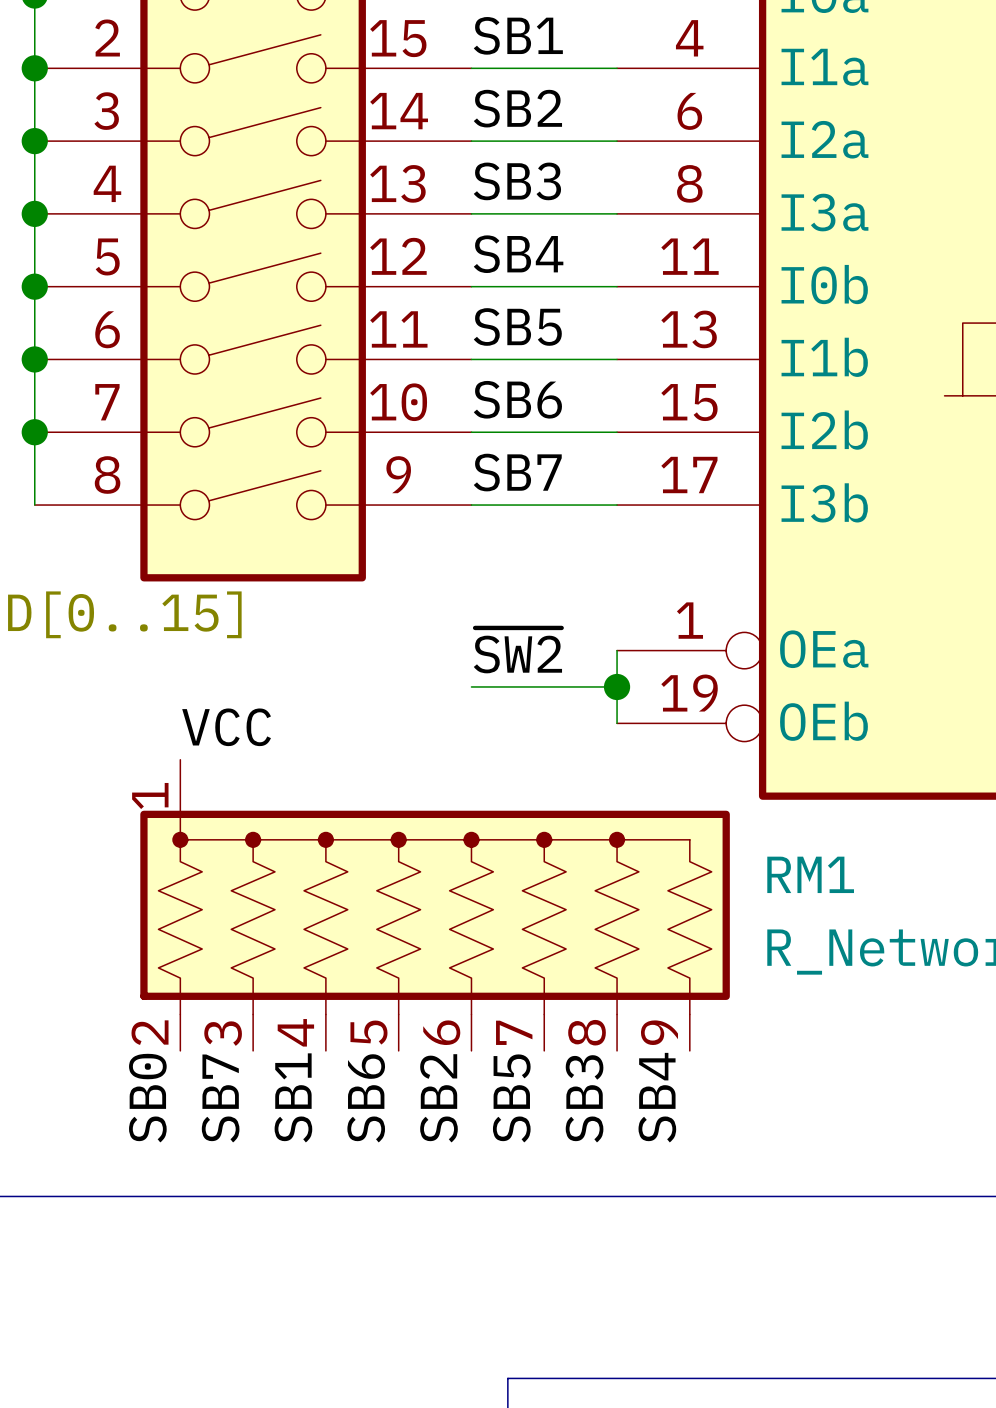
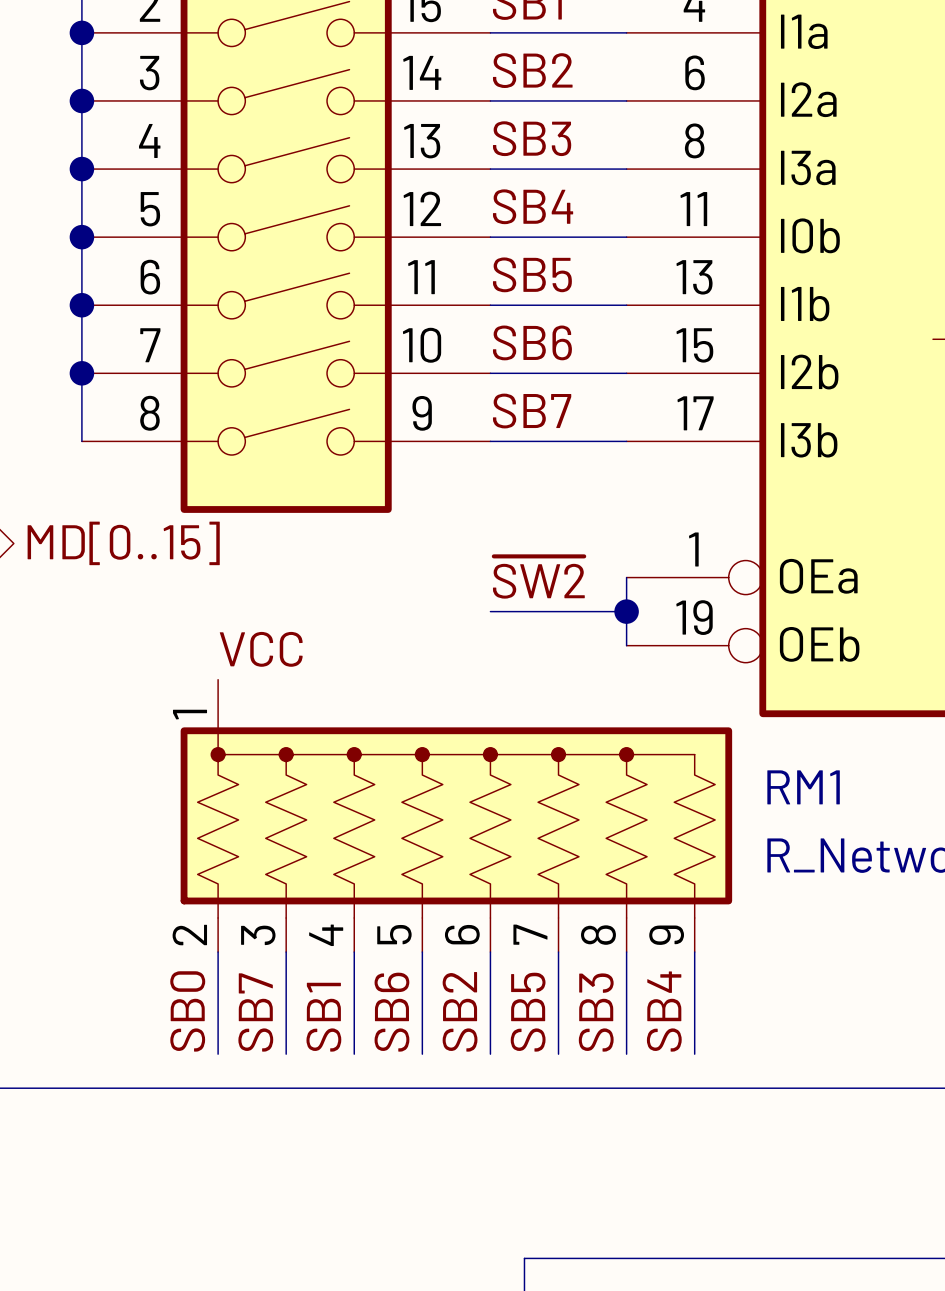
wire: none -> (218, 952) (218, 1054)
wire: none -> (286, 952) (286, 1054)
wire: none -> (354, 952) (354, 1054)
wire: none -> (422, 952) (422, 1054)
wire: none -> (490, 952) (490, 1054)
wire: none -> (558, 952) (558, 1054)
wire: none -> (626, 952) (626, 1054)
wire: none -> (694, 952) (694, 1054)
label position: SB1 (293, 1097) -> SB1 (323, 1017)
label position: SB4 (657, 1097) -> SB4 (664, 1011)
label position: SB0 (147, 1098) -> SB0 (187, 1011)
label position: SB7 (220, 1098) -> SB7 (255, 1012)
label position: SB6 (366, 1098) -> SB6 (391, 1012)
label position: SB2 (438, 1098) -> SB2 (460, 1011)
label position: SB5 (511, 1098) -> SB5 (528, 1012)
label position: SB3 (584, 1098) -> SB3 (596, 1012)

